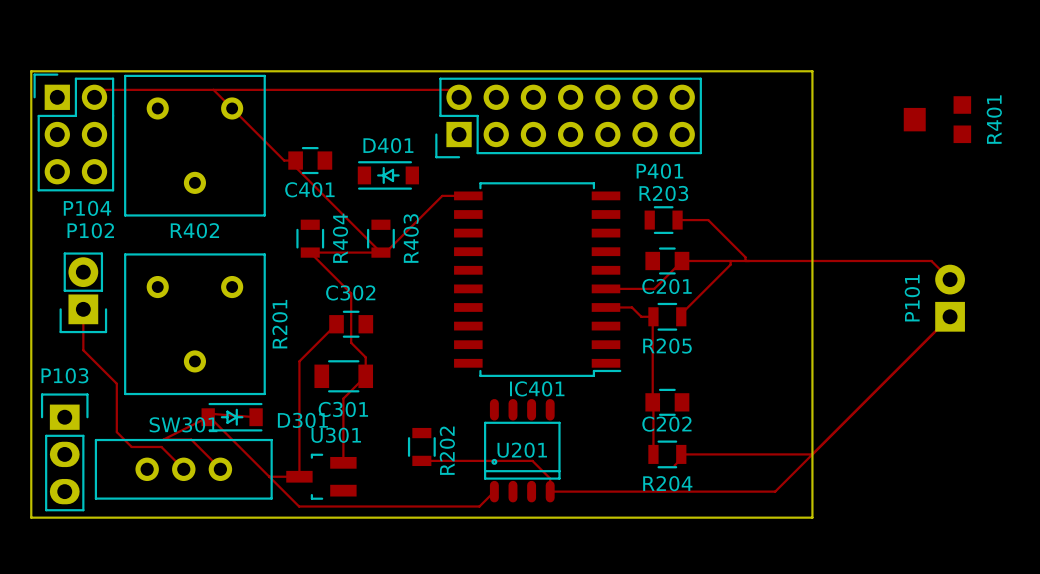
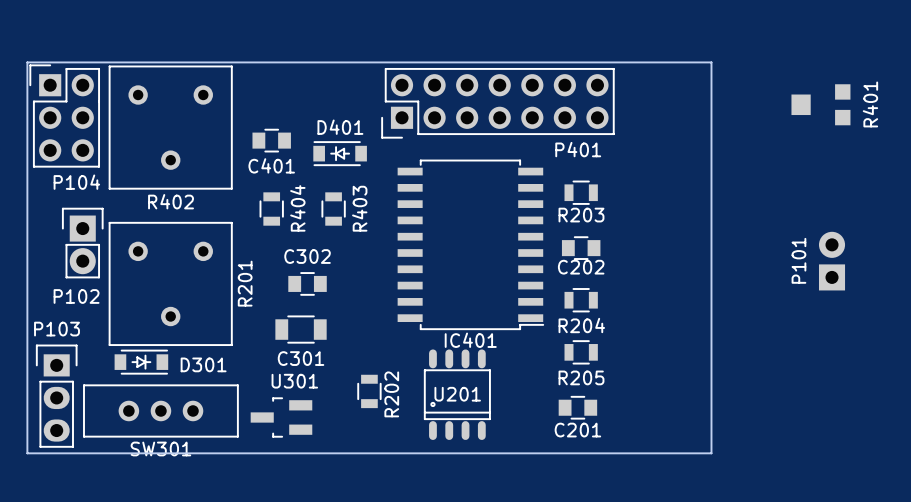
track: (213, 89) (284, 160) (295, 160) (295, 167) (380, 252) -> none
track: (94, 97) (101, 89) (451, 89) (459, 97) -> none
R203 name position: R203 (663, 193) -> R203 (581, 215)
track: (468, 195) (442, 195) (385, 252) (310, 252) (351, 293) (351, 342) (365, 357) (365, 376) (343, 398) (343, 462) -> none
track: (674, 220) (708, 220) (745, 257) (745, 260) -> none
C201 position: (667, 260) -> (577, 407)
track: (682, 260) (931, 260) (950, 279) (938, 279) -> none
track: (730, 260) (730, 264) (681, 314) (681, 316) -> none
track: (682, 261) (654, 288) (606, 288) -> none
P102 rotation: 0° (83, 292) -> 180° (82, 243)
track: (606, 307) (632, 307) (641, 316) (653, 316) (653, 454) -> none
track: (83, 309) (83, 350) (116, 383) (116, 432) (131, 446) (161, 446) (183, 469) -> none
R205 position: (667, 316) -> (581, 352)
track: (950, 316) (775, 491) (550, 491) (550, 478) (532, 460) (421, 460) -> none
track: (336, 324) (299, 361) (299, 476) (269, 476) -> none
C202 position: (667, 402) -> (581, 248)
track: (208, 417) (163, 439) (191, 439) (220, 469) -> none
D301 position: (232, 417) -> (141, 362)
track: (256, 417) (206, 413) (299, 506) (479, 506) (494, 491) -> none
SW301 name position: SW301 (183, 424) -> SW301 (160, 448)
R204 position: (667, 454) -> (581, 300)
track: (681, 454) (812, 454) -> none
track: (677, 462) (674, 465) -> none

